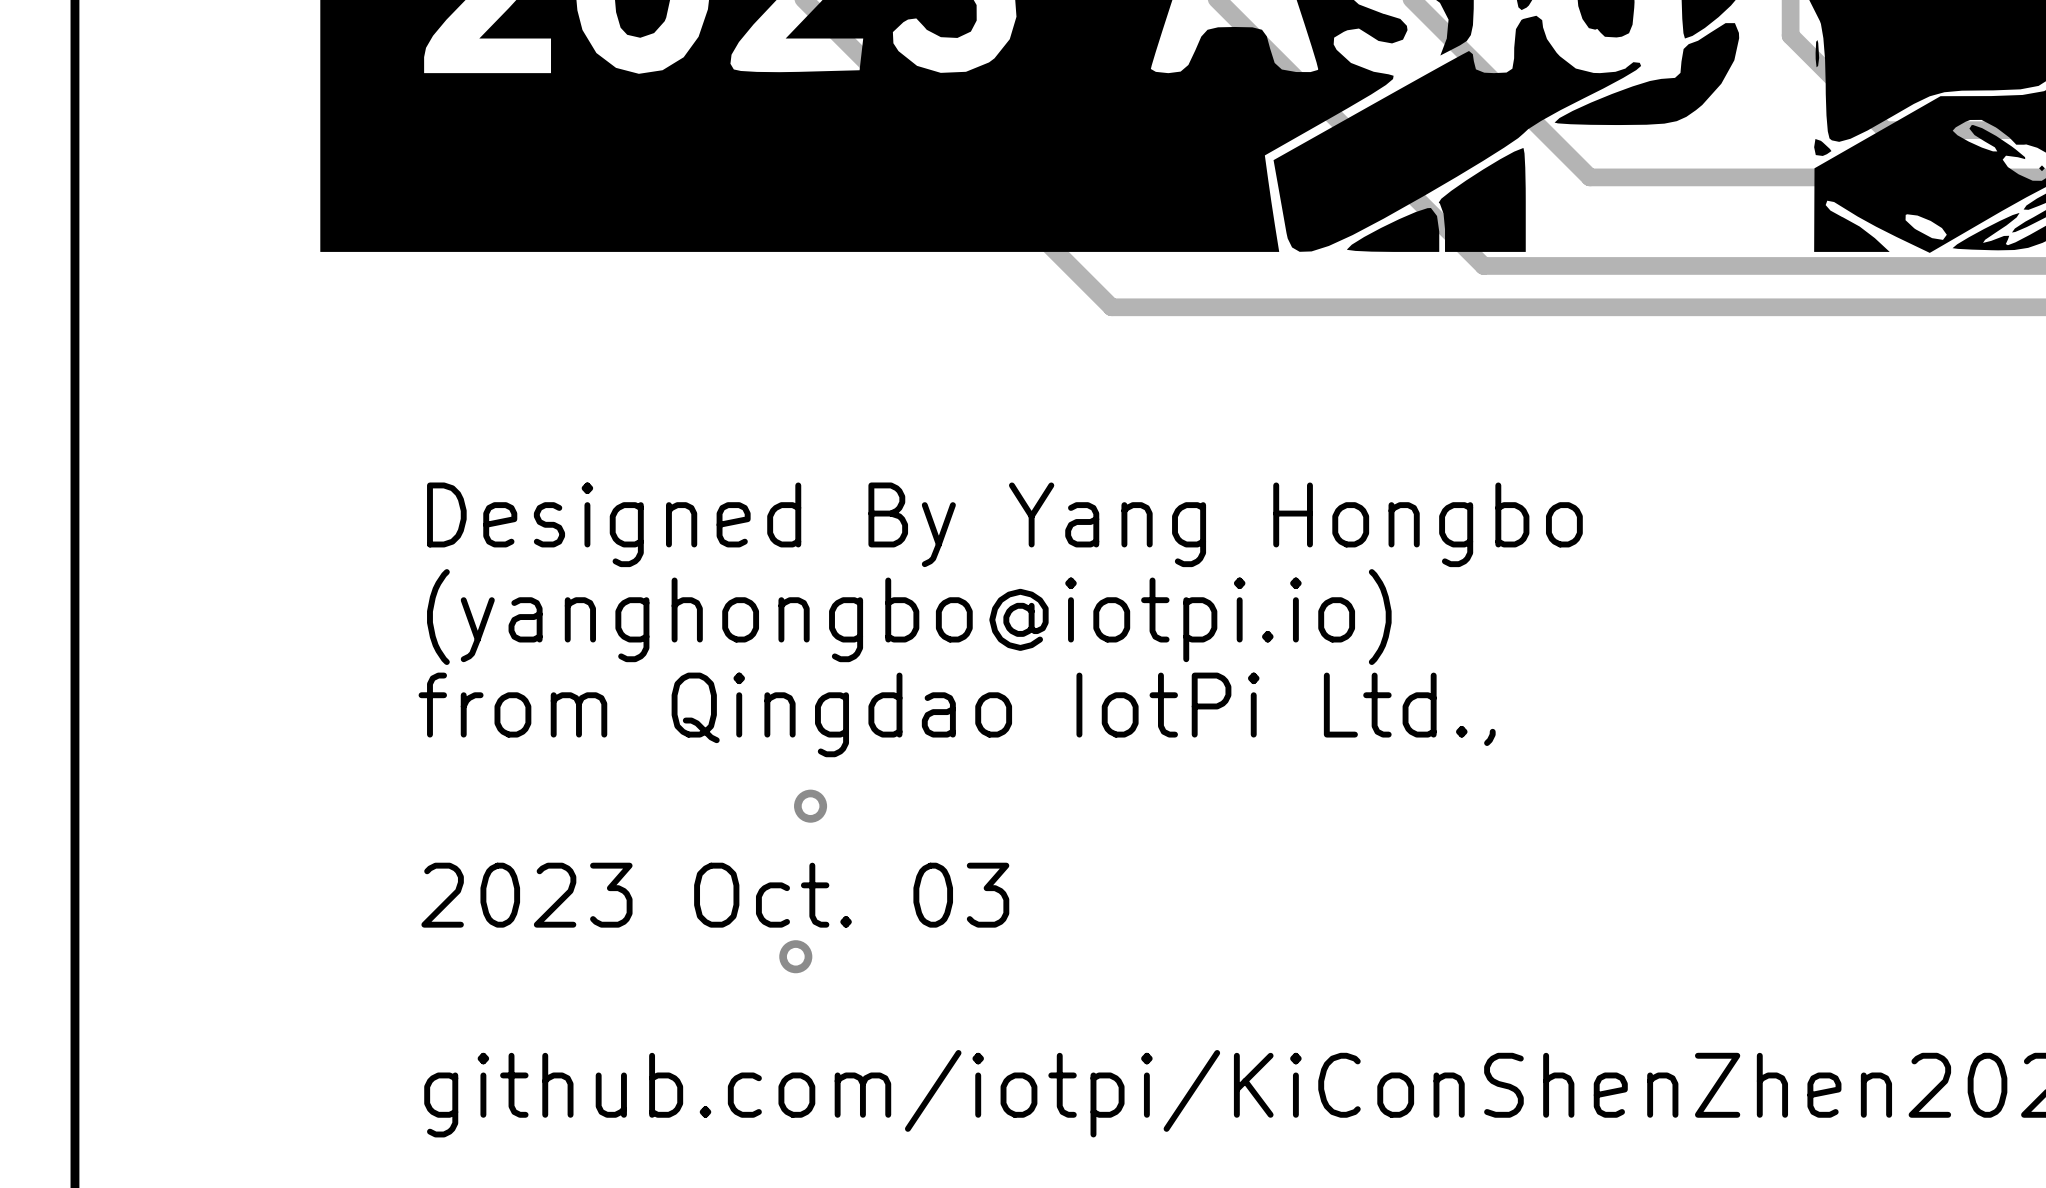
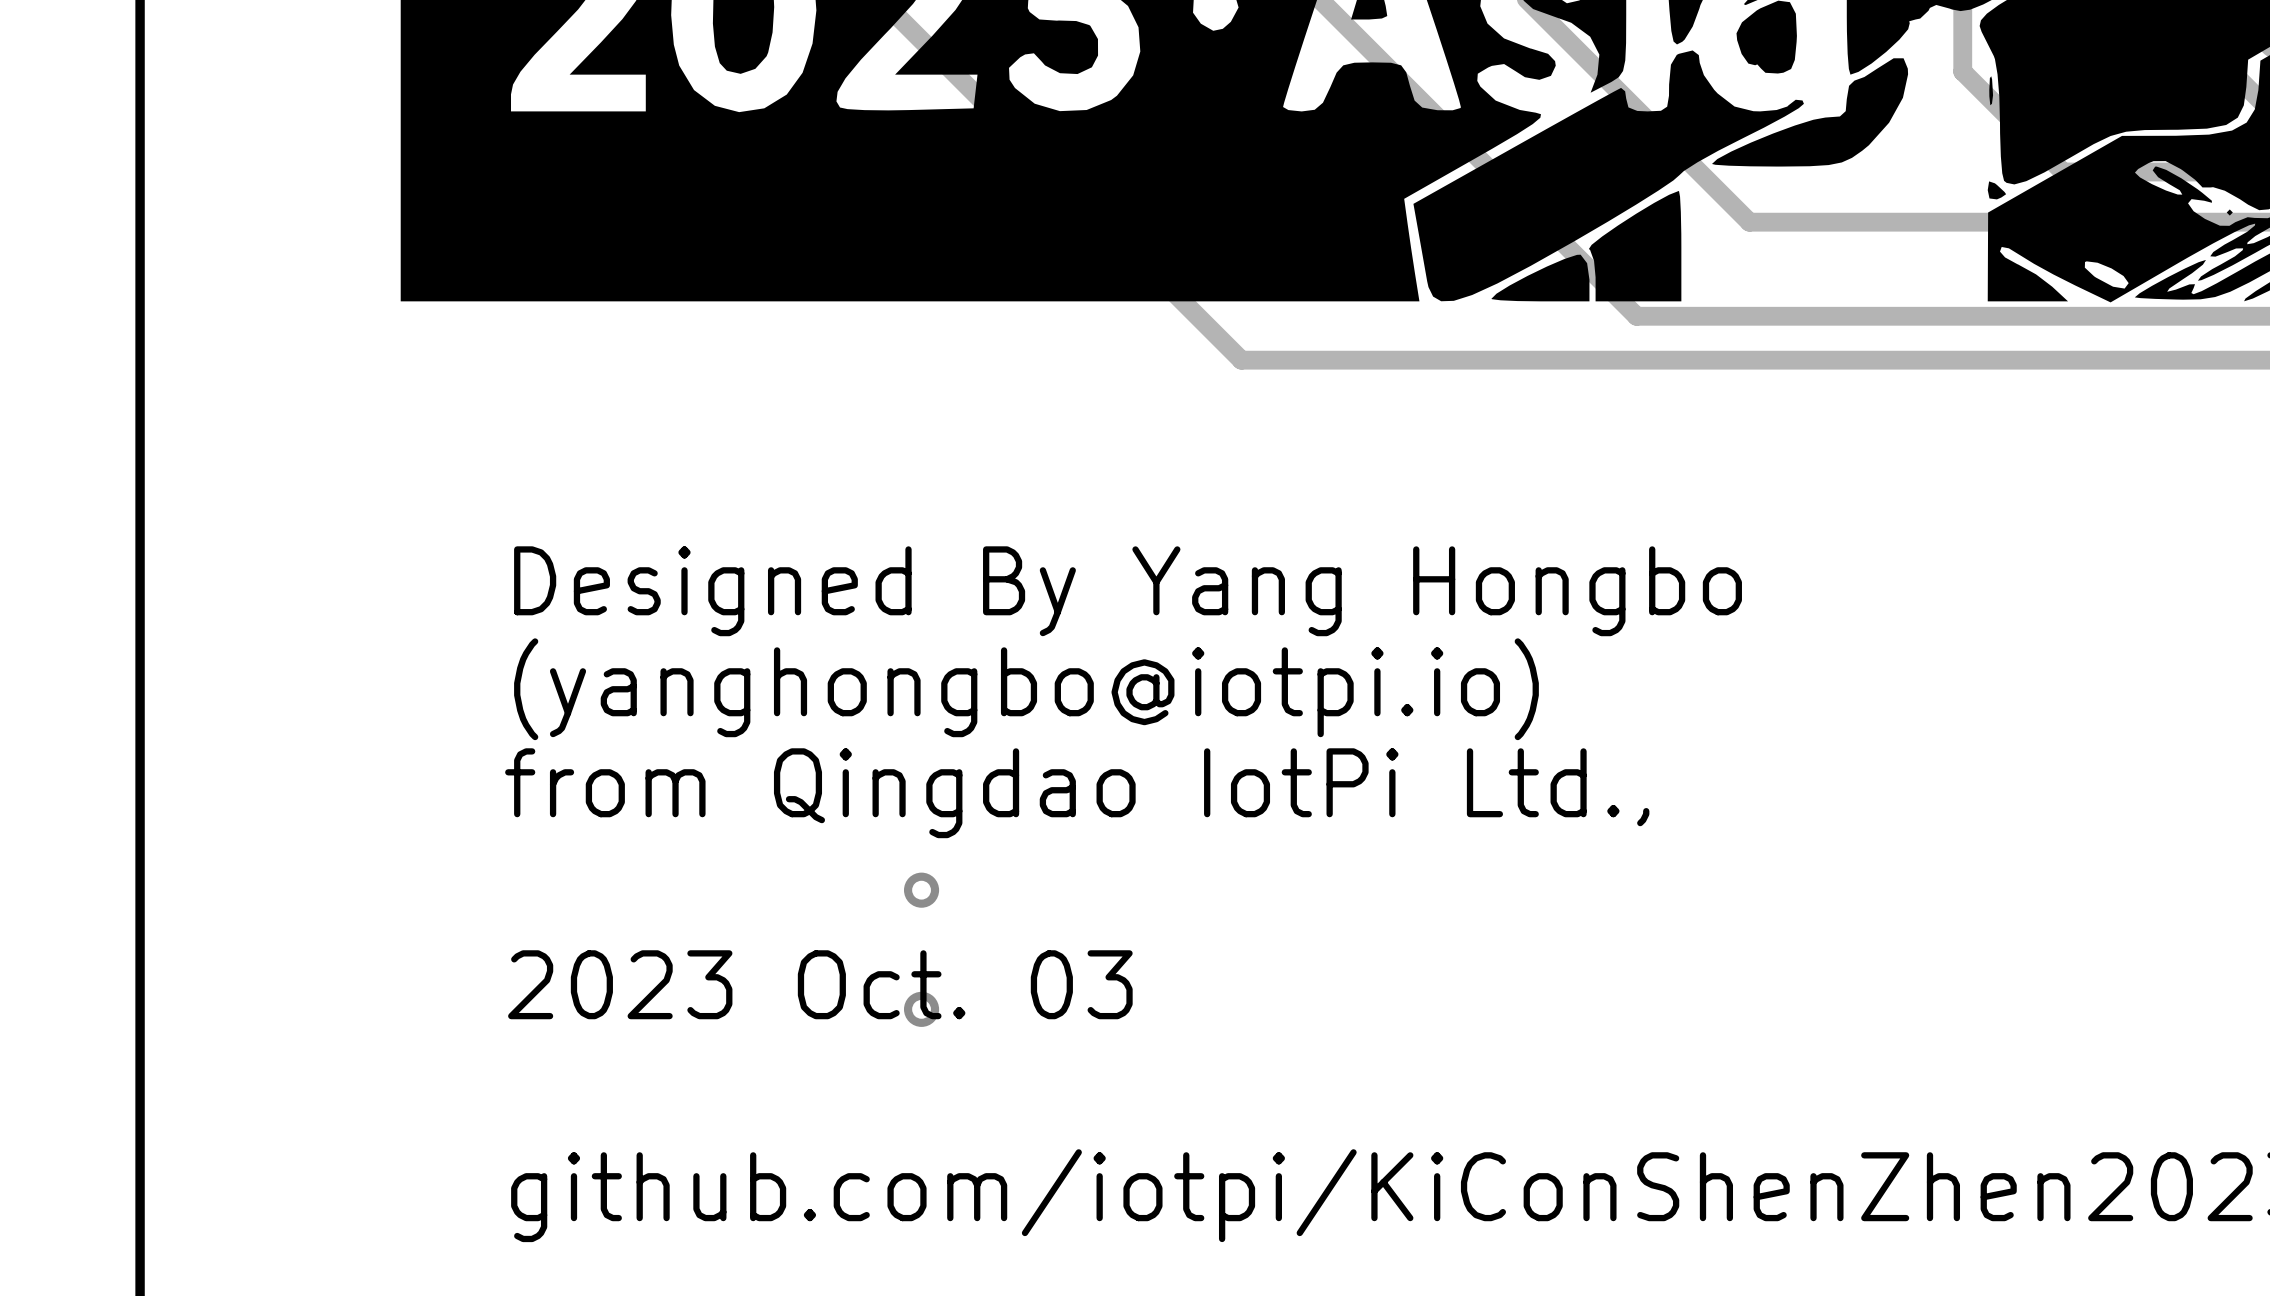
via position: (795, 956) -> (921, 1009)

